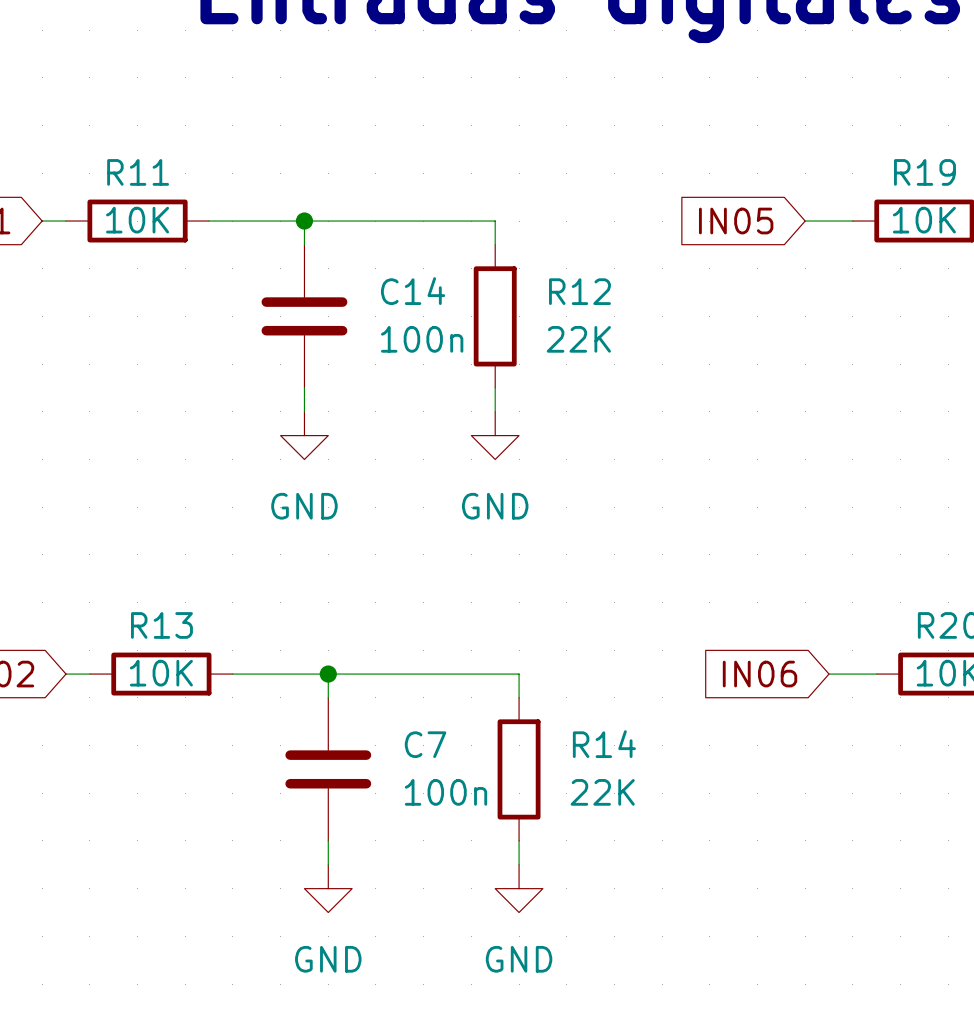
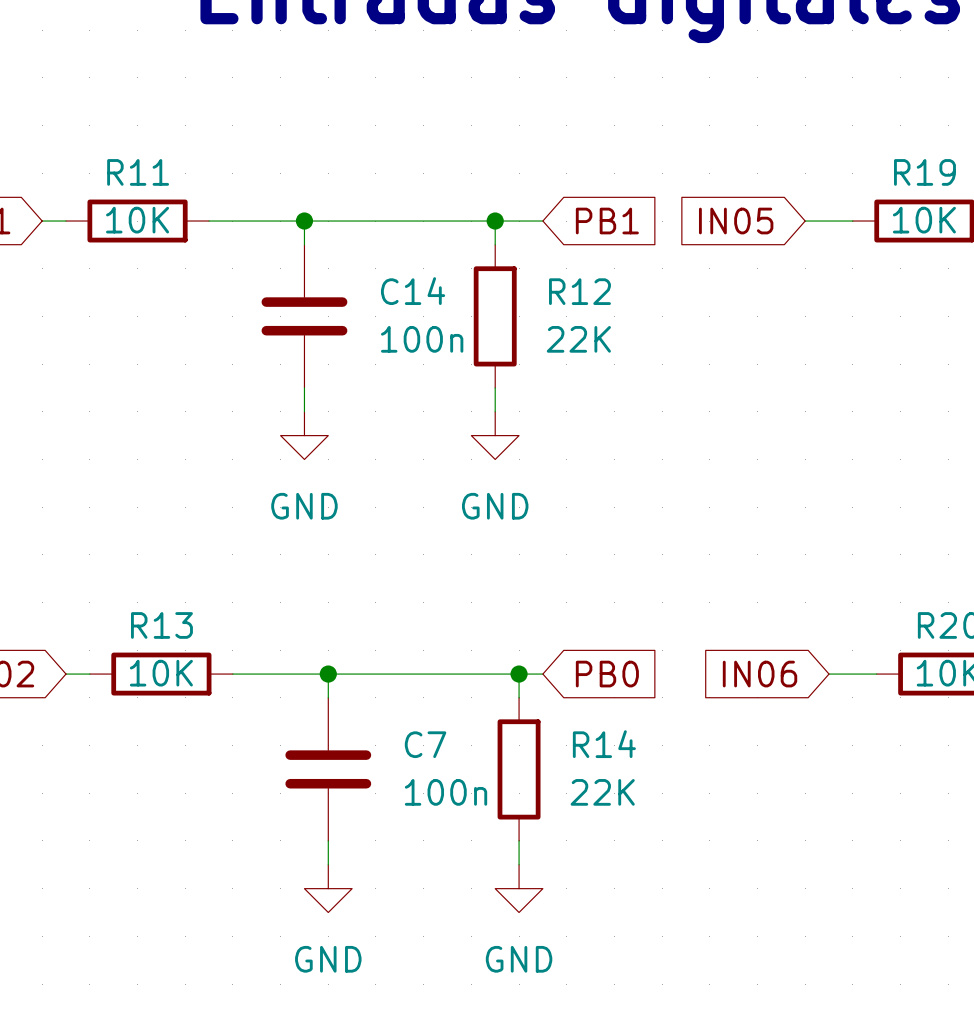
wire: none -> (495, 221) (542, 221)
junction: none -> (495, 221)
global label: none -> PB1 (607, 221)
wire: none -> (519, 674) (542, 674)
junction: none -> (519, 674)
global label: none -> PB0 (607, 674)

